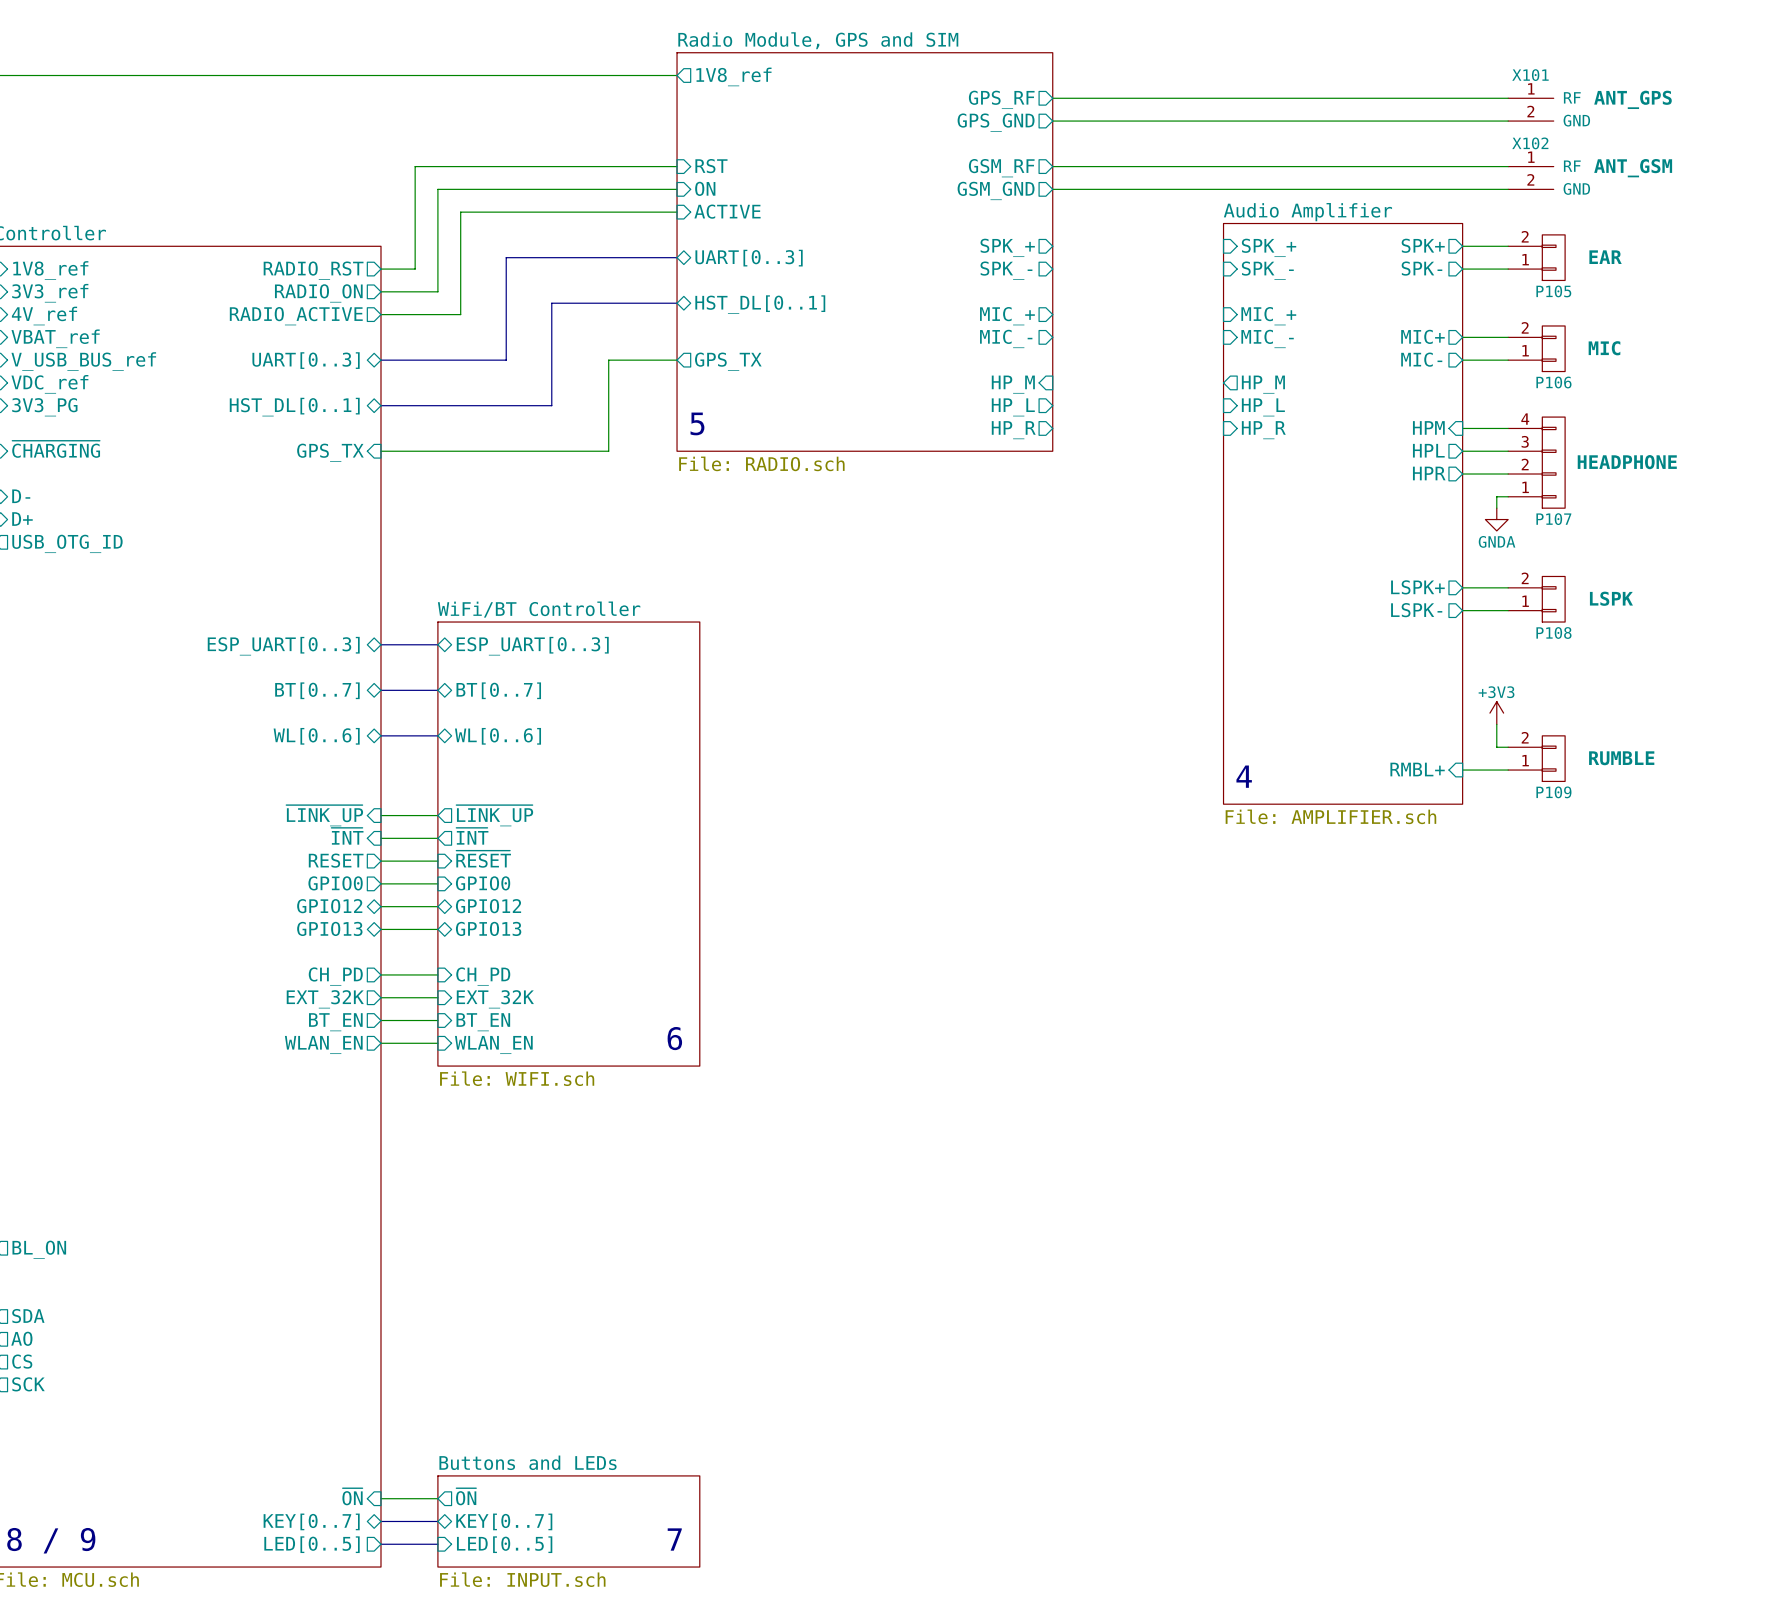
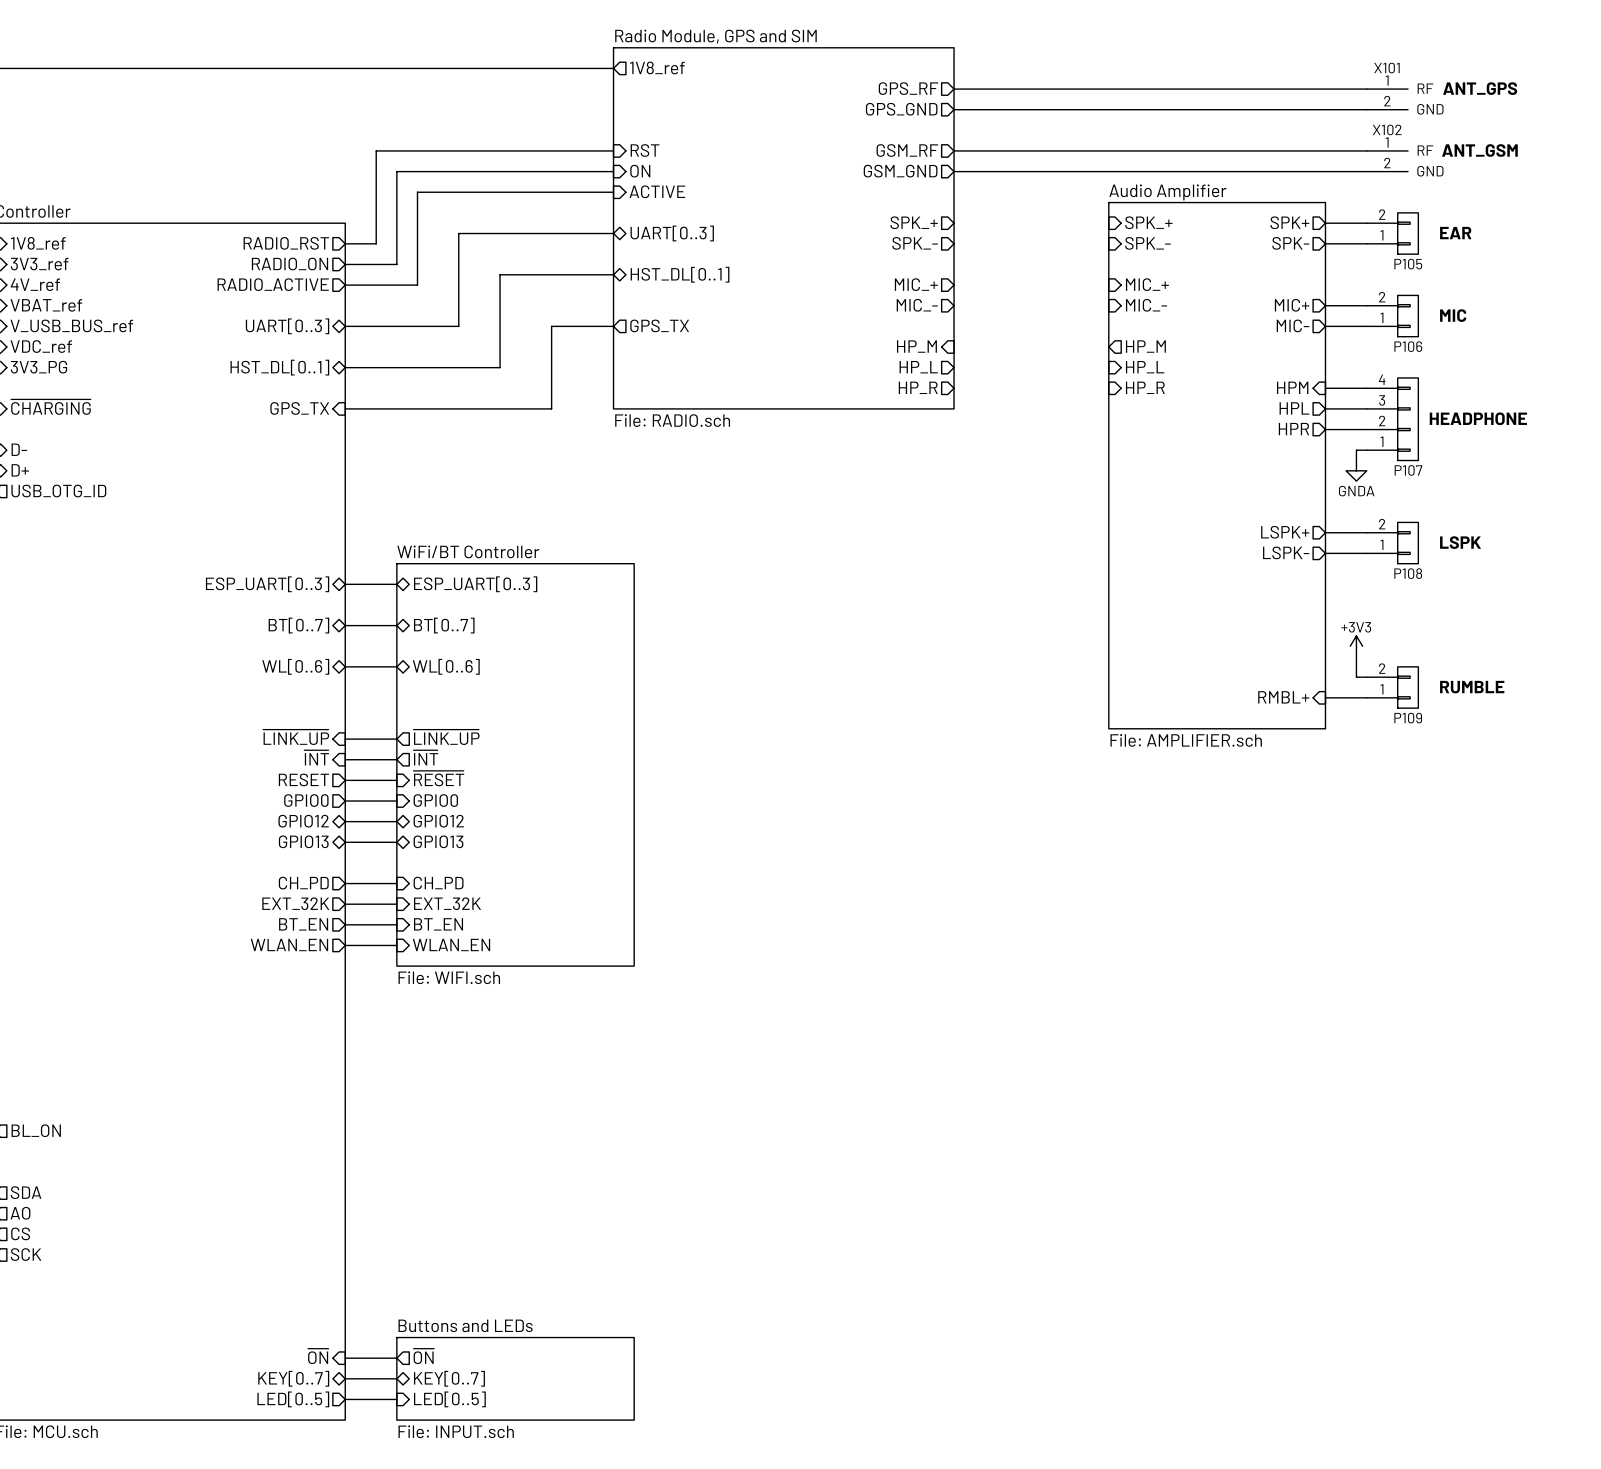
text: 5 (697, 423) -> none
text: 4 (1244, 776) -> none
text: 6 (674, 1038) -> none
text: 7 (674, 1539) -> none
text: 8 / 9 (51, 1540) -> none

